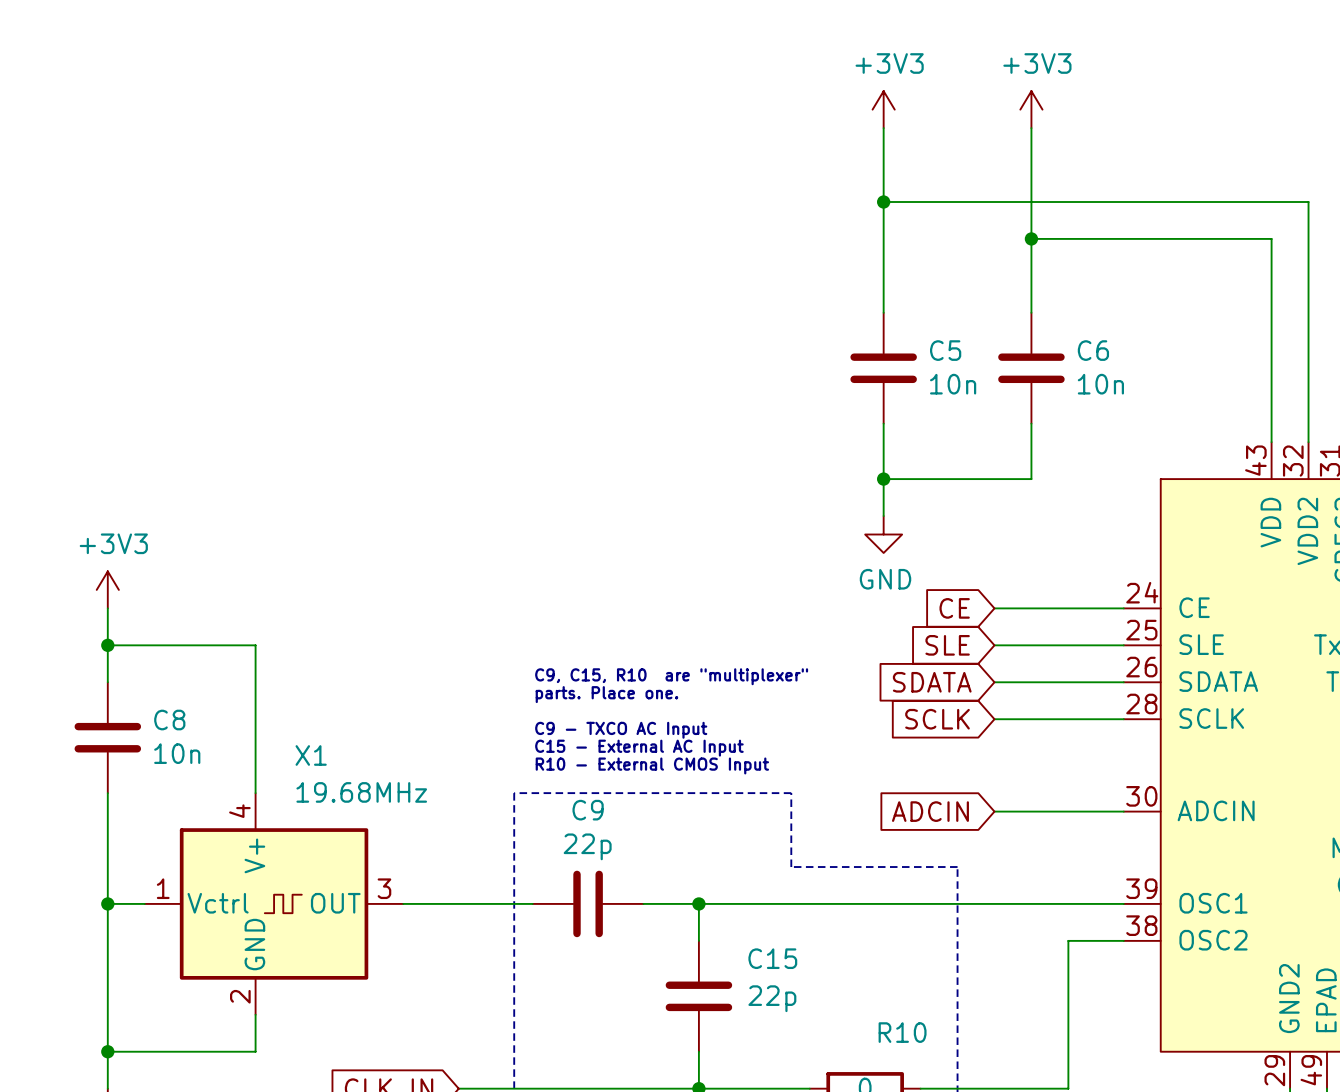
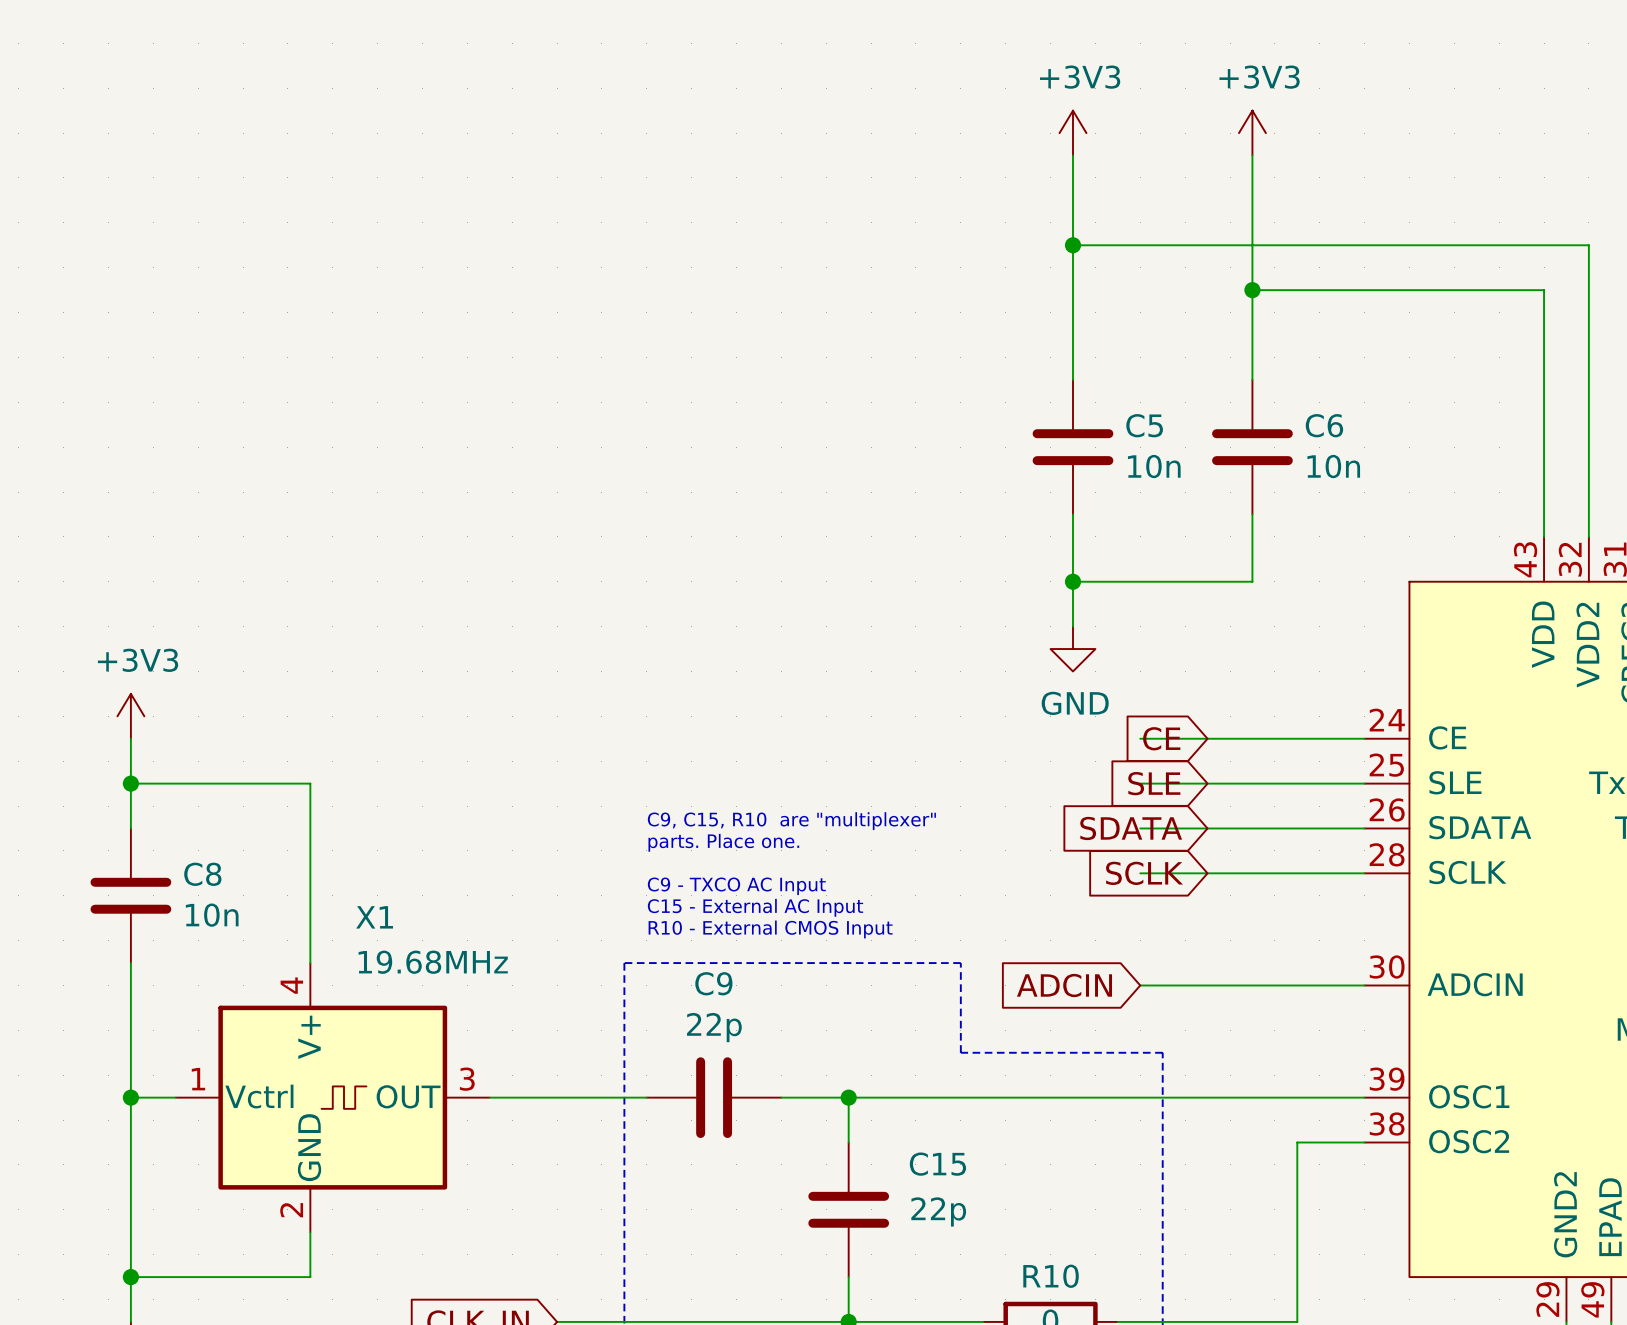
wire: none -> (1140, 738) (1207, 738)
wire: none -> (1140, 783) (1207, 783)
wire: none -> (1140, 828) (1207, 828)
wire: none -> (1140, 873) (1207, 873)
global label position: ADCIN (930, 811) -> ADCIN (1064, 985)
wire: none -> (1140, 985) (1207, 985)
R10 name position: R10 (902, 1032) -> R10 (1051, 1276)

